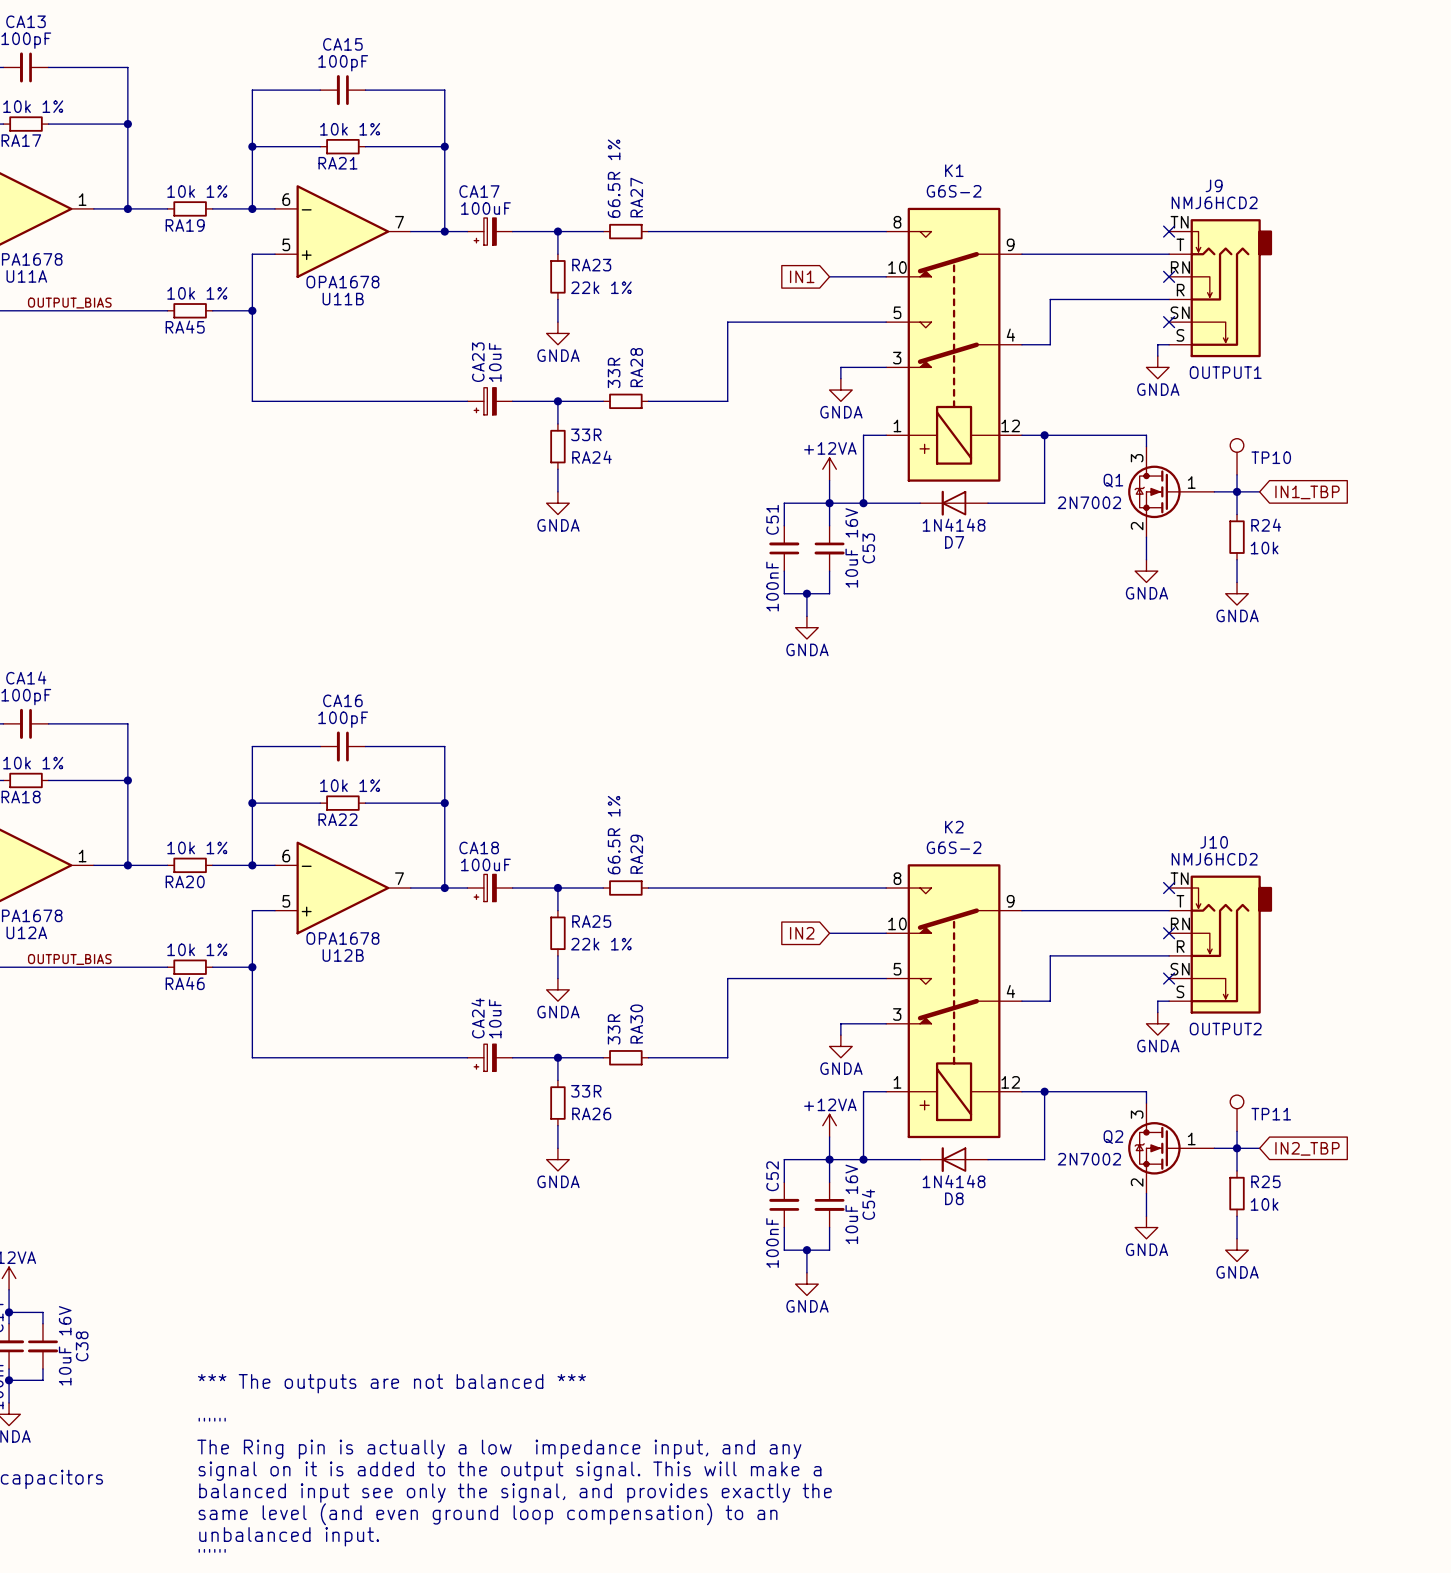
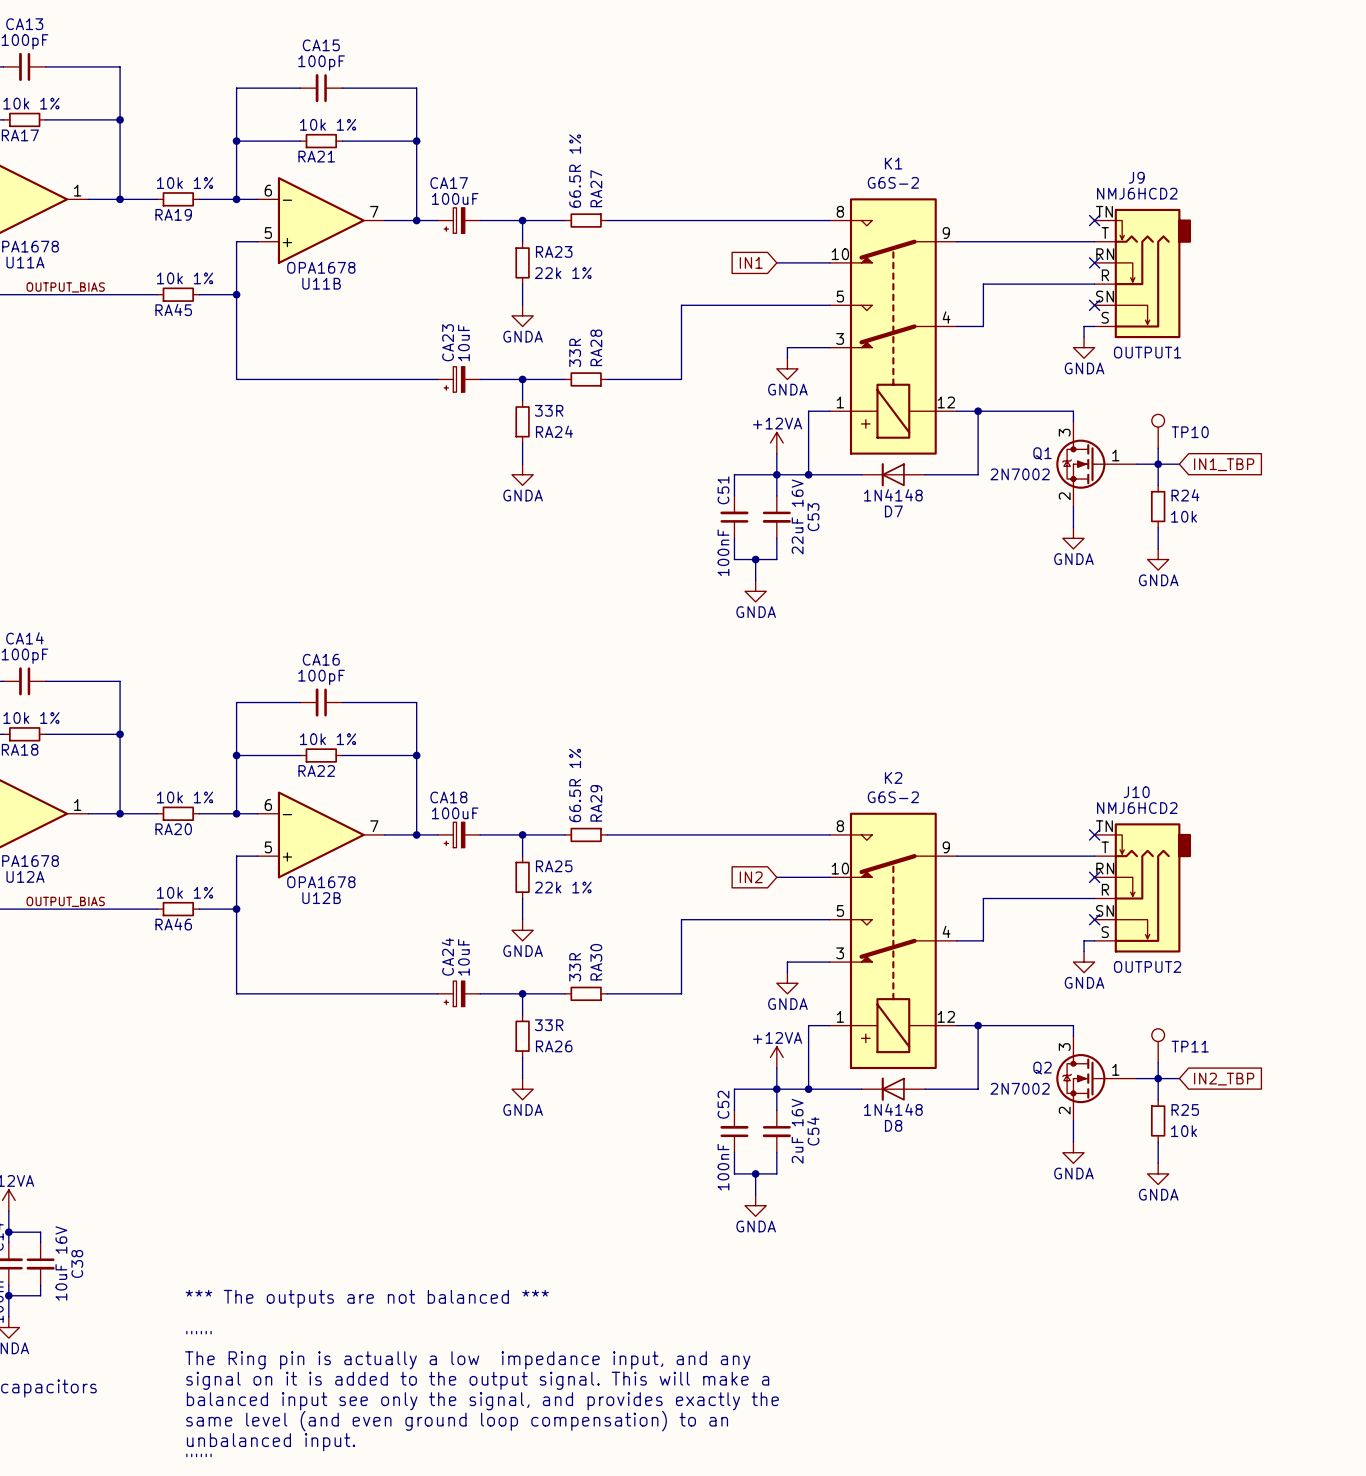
C53 value: 10uF 16V (851, 547) -> 22uF 16V (797, 516)
C54 value: 10uF 16V (851, 1204) -> 2uF 16V (797, 1131)

